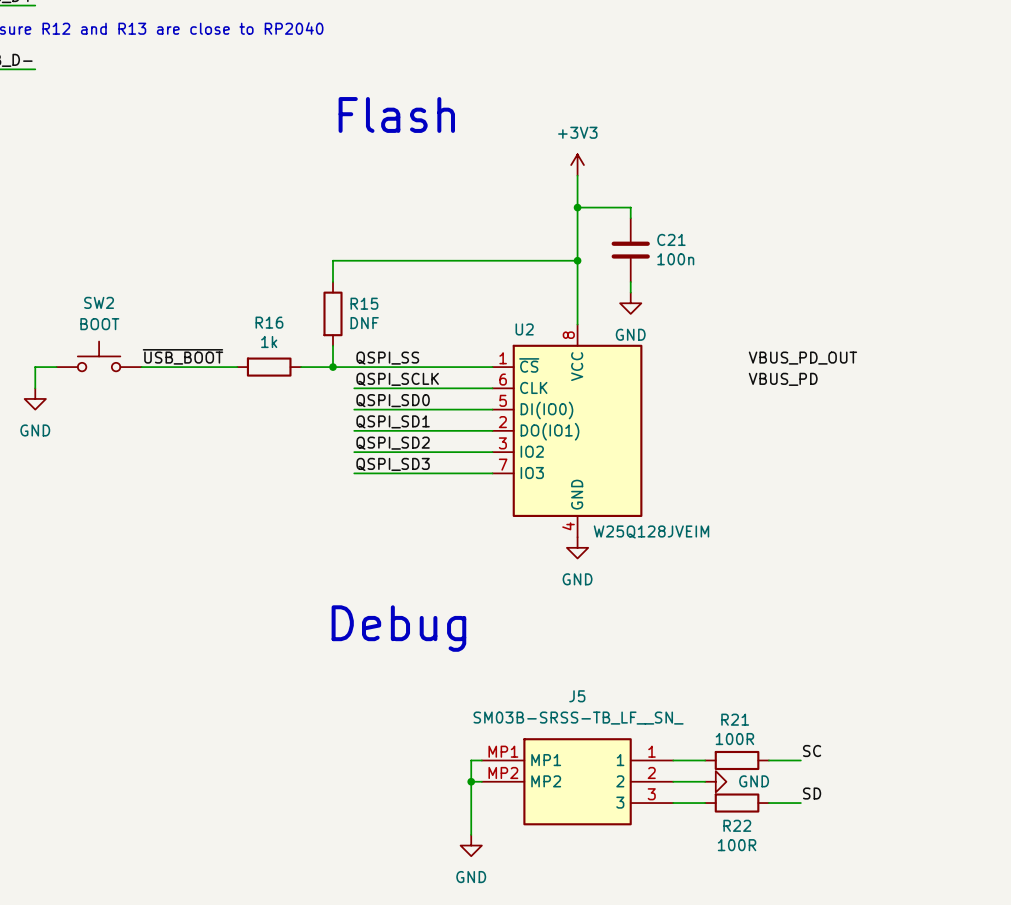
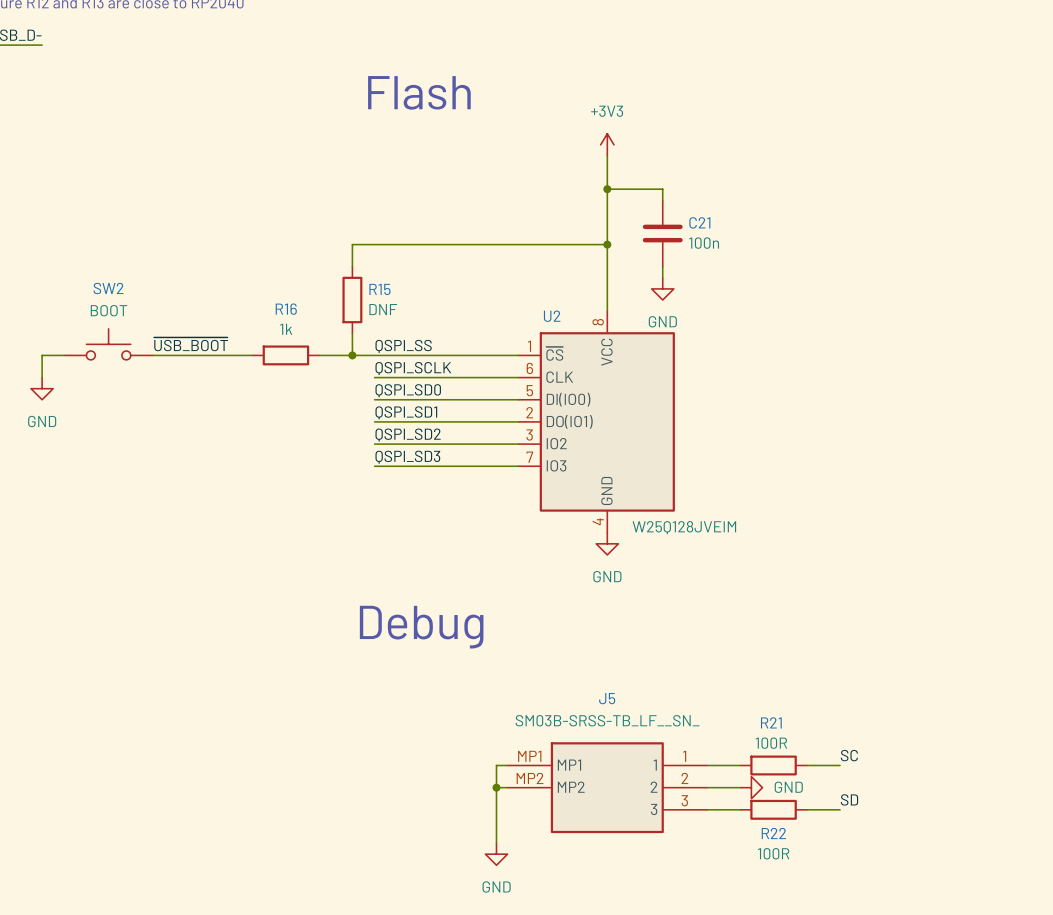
label: VBUS_PD_OUT (802, 358) -> none
label: VBUS_PD (783, 379) -> none

